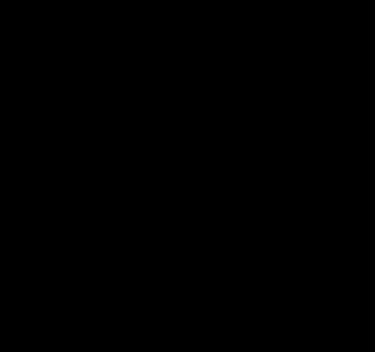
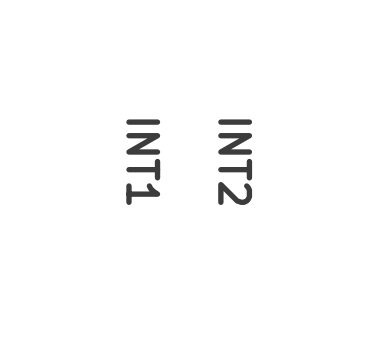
text: none -> INT1 (143, 162)
text: none -> INT2 (235, 162)

